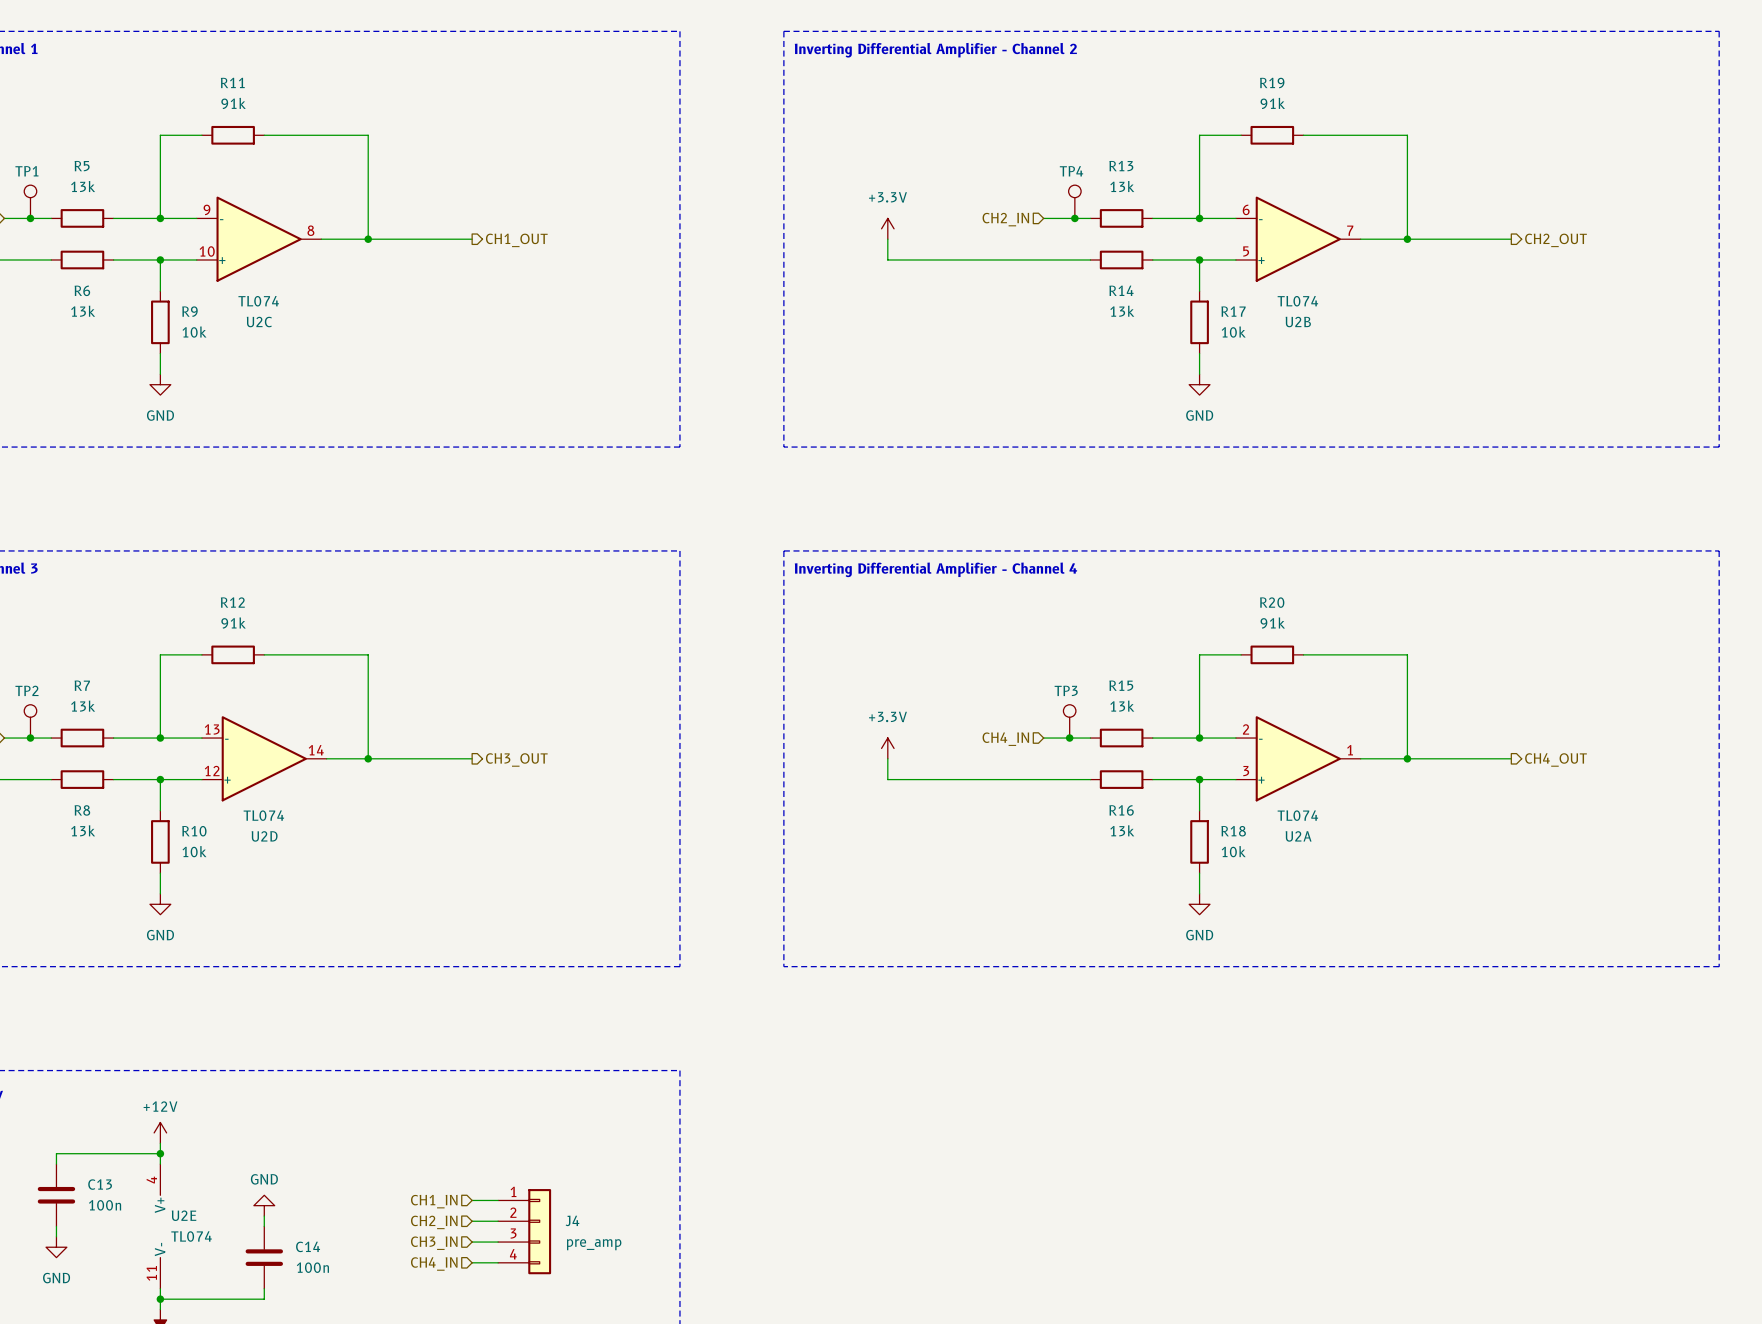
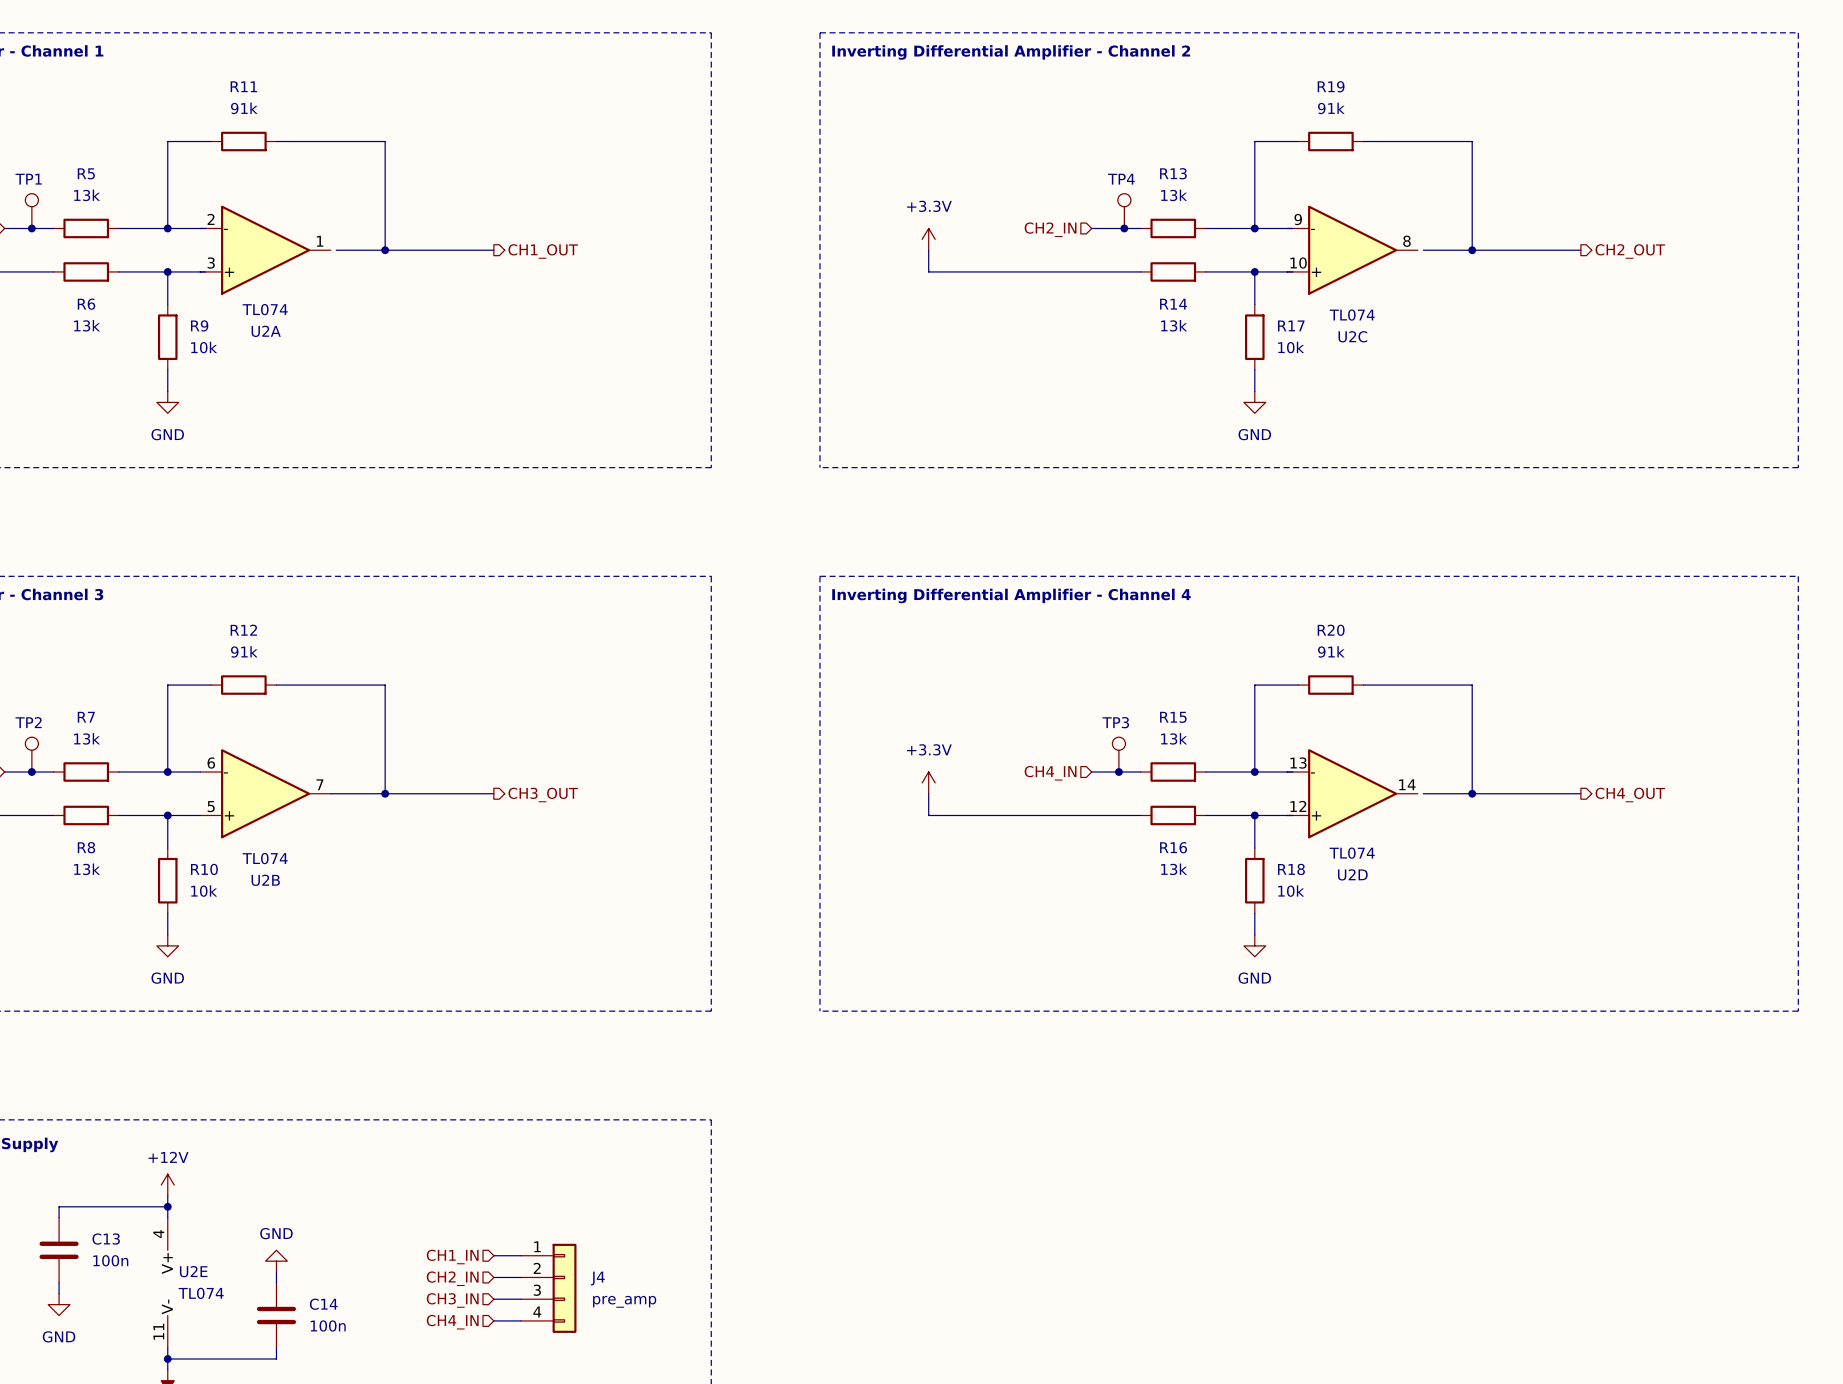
U2C position: (259, 239) -> (1352, 250)
U2B position: (1298, 239) -> (265, 793)
U2D position: (264, 758) -> (1352, 793)
U2A position: (1298, 758) -> (265, 250)

